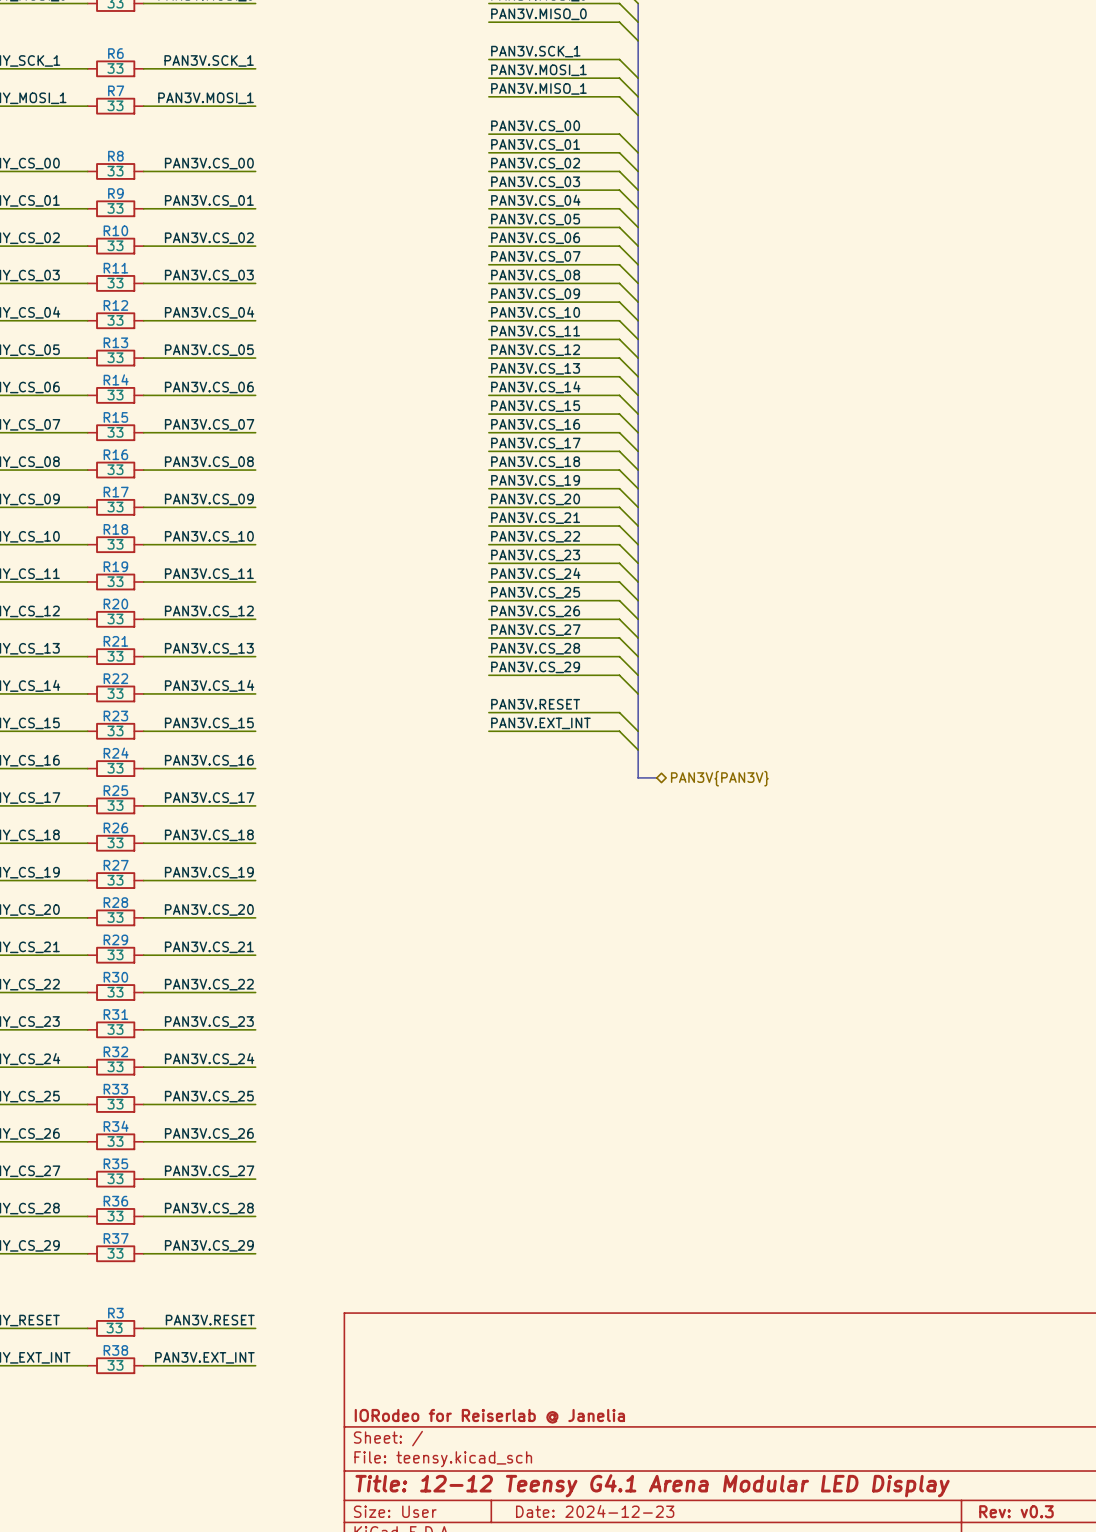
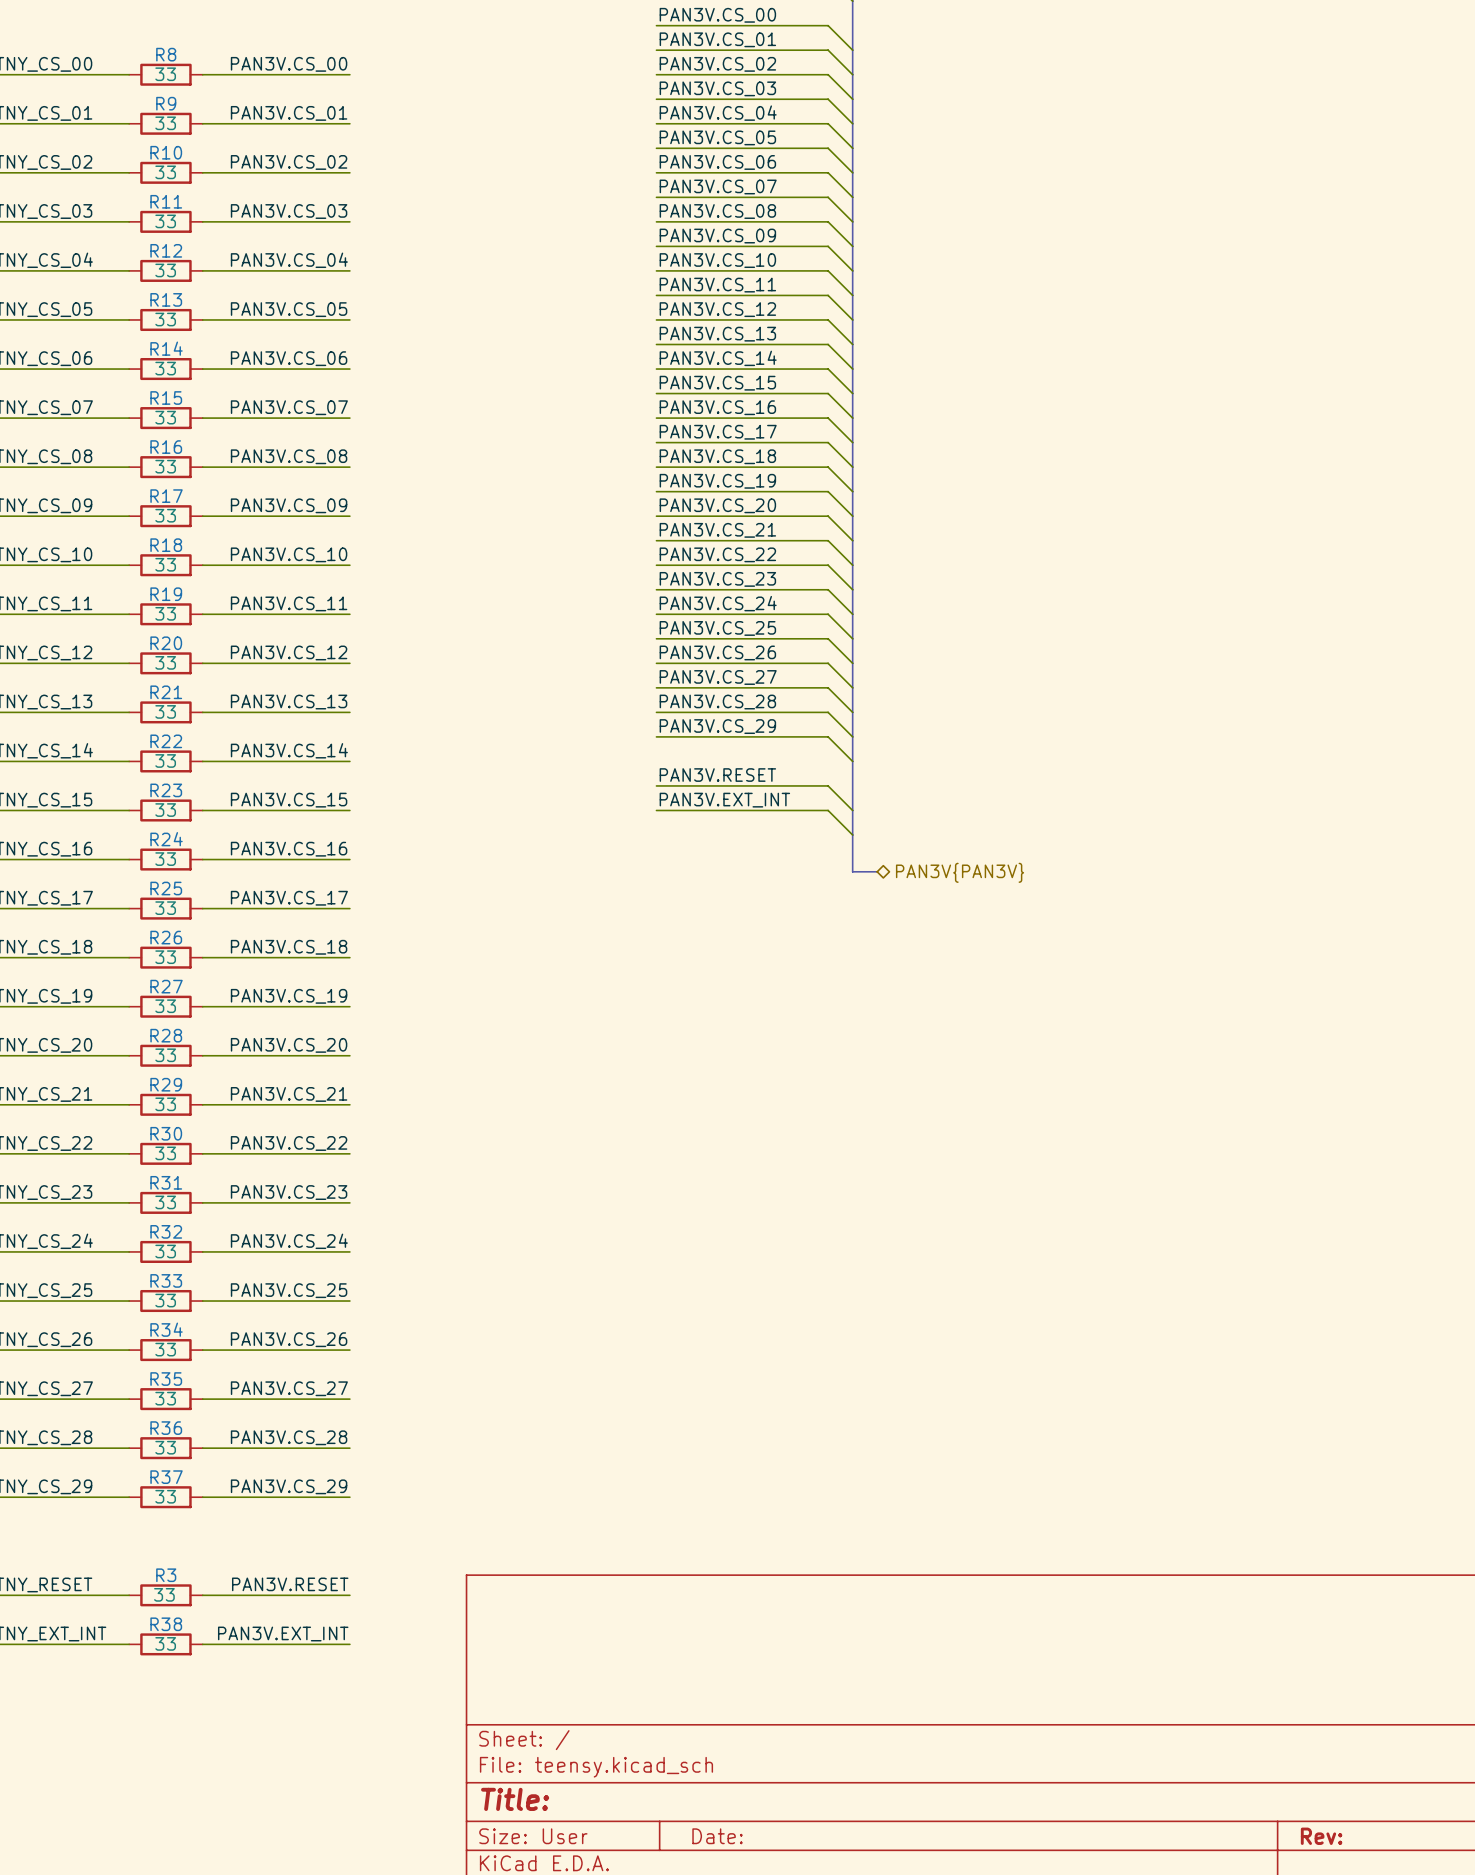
title block: IORodeo for Reiserlab @ Janelia (489, 1416) -> none
title block: Title: 12-12 Teensy G4.1 Arena Modular LED Display (652, 1485) -> Title: (515, 1799)
title block: Date: 2024-12-23 (595, 1511) -> Date: (717, 1836)
title block: Rev: v0.3 (1016, 1511) -> Rev: (1321, 1836)

